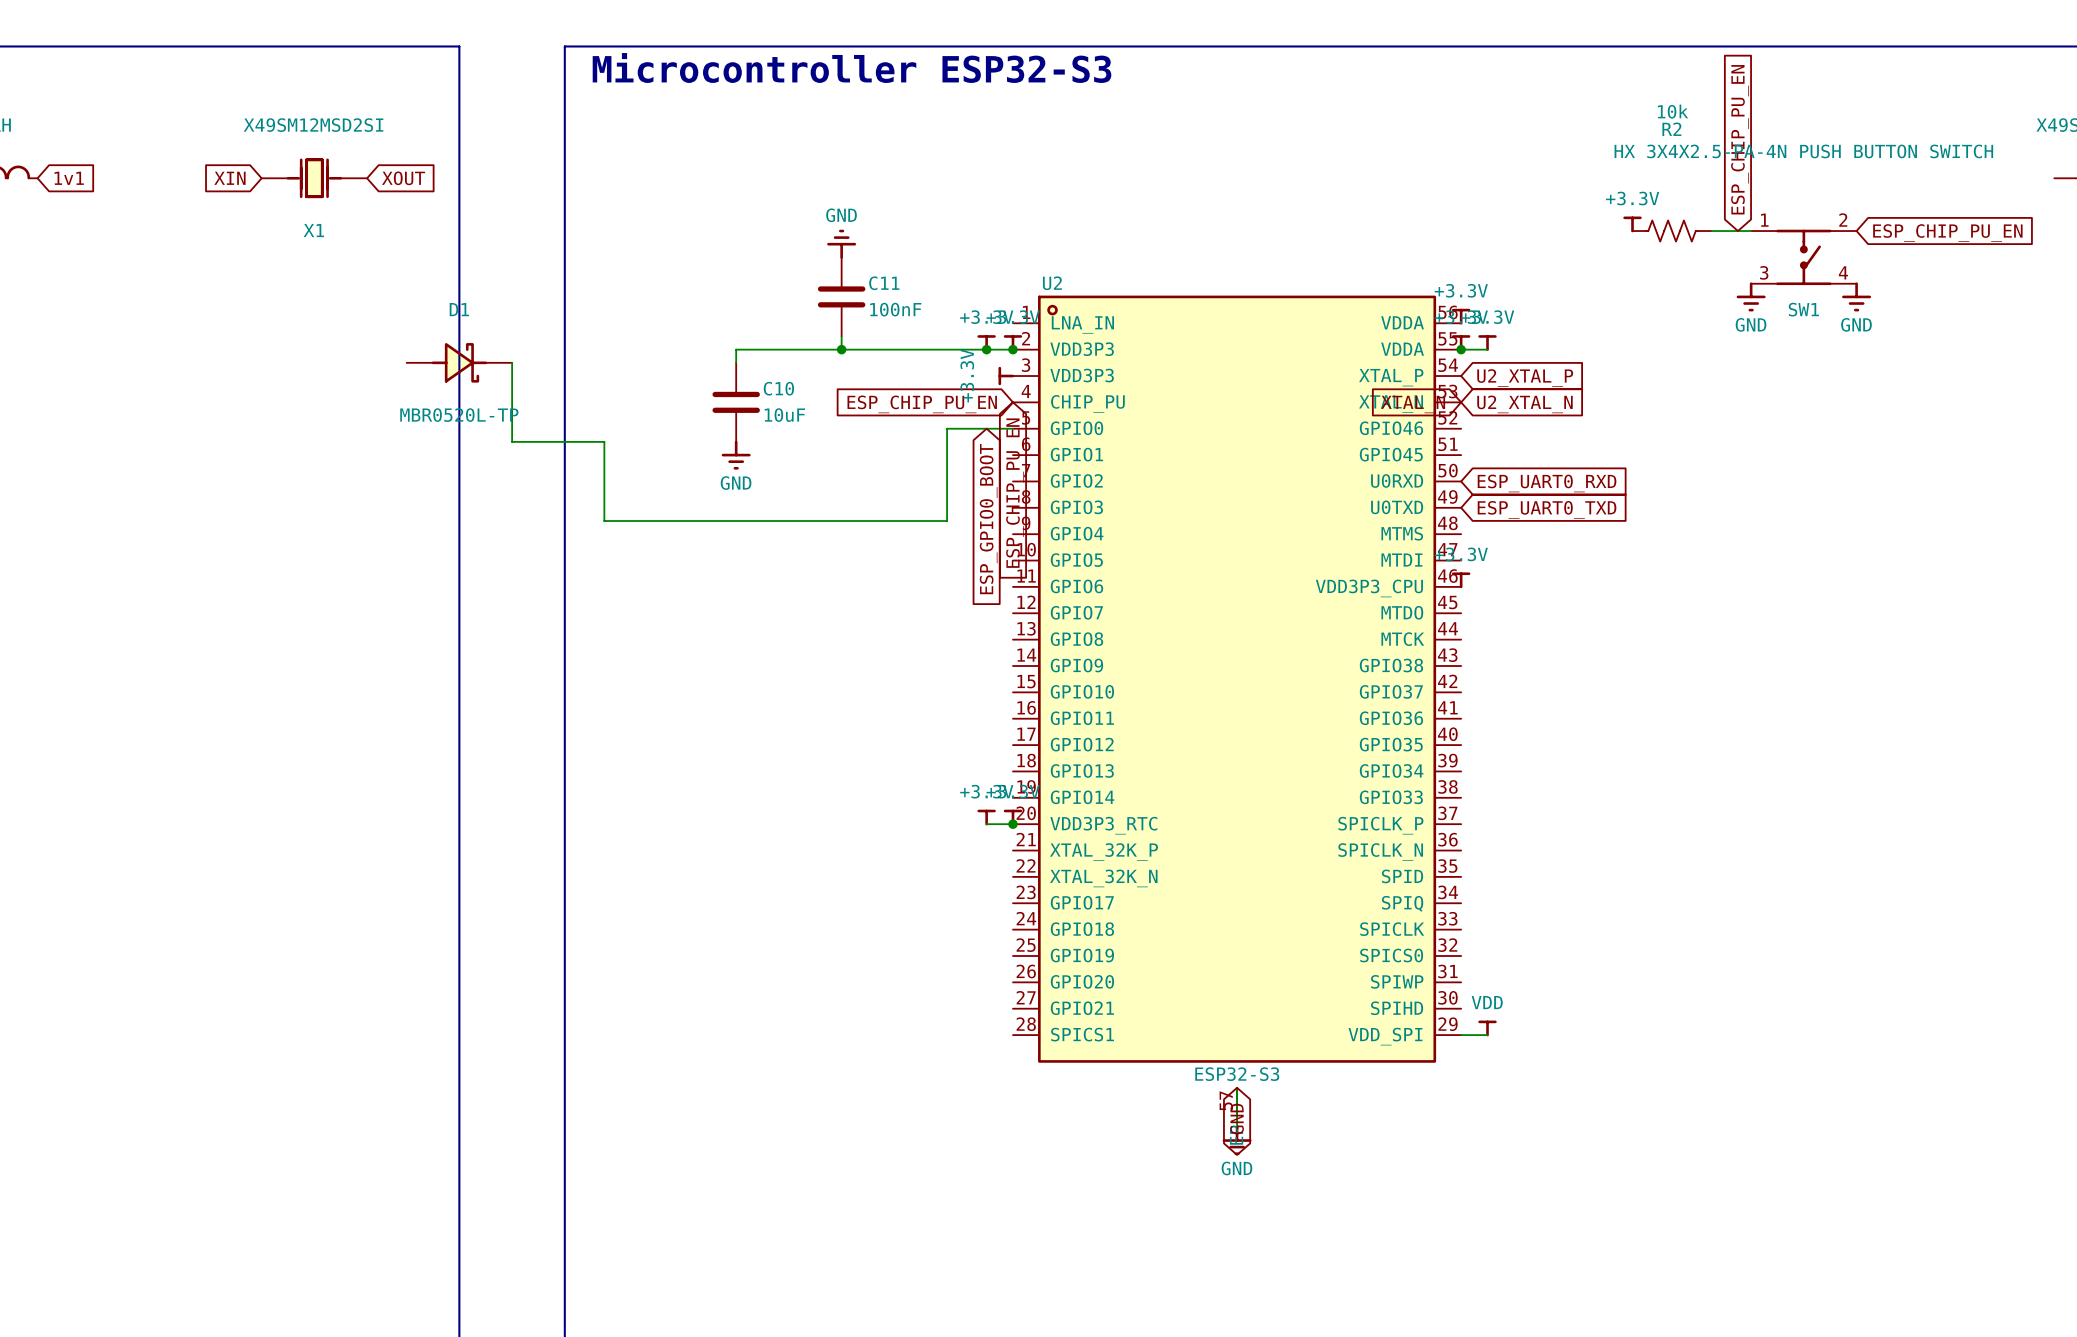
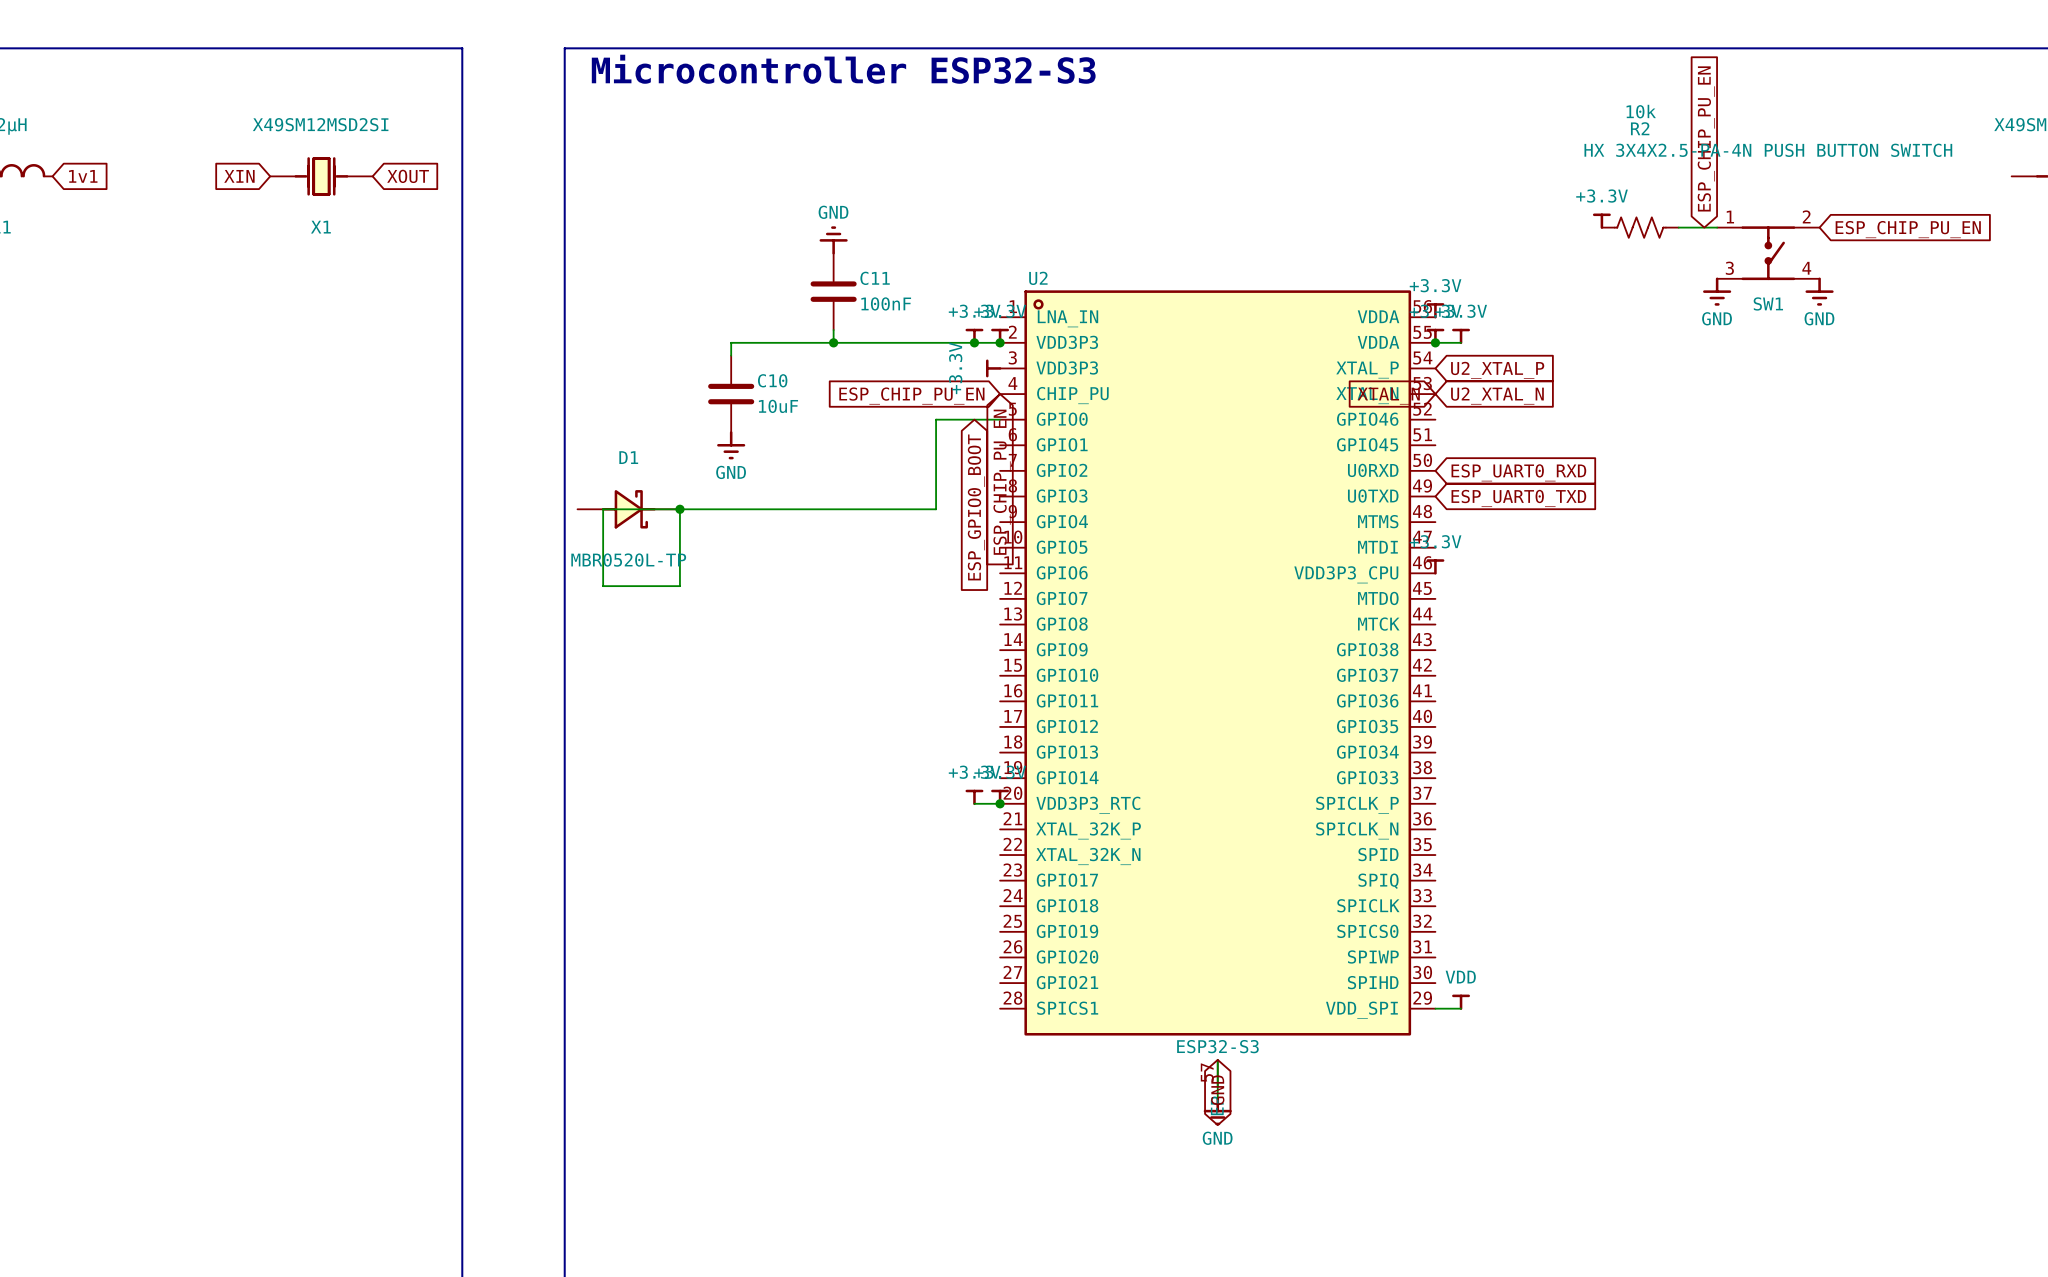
D1 position: (459, 362) -> (628, 509)
wire: (512, 362) (512, 441) (604, 441) (604, 521) -> (679, 509) (679, 586) (603, 586) (603, 509)
junction: none -> (679, 509)

